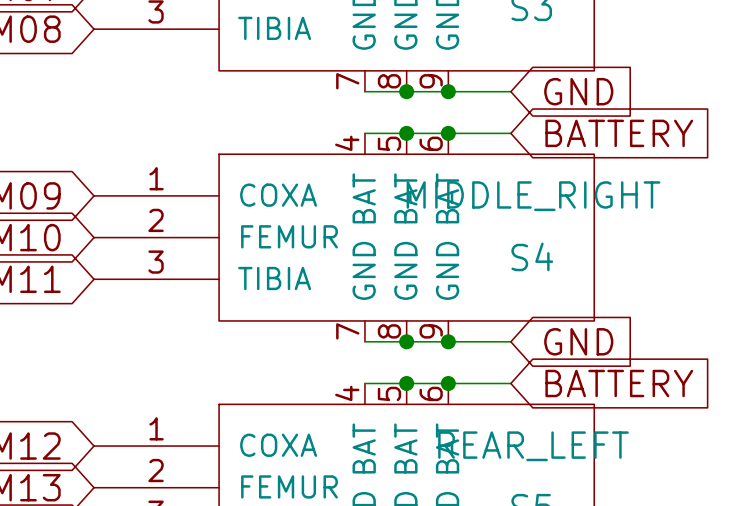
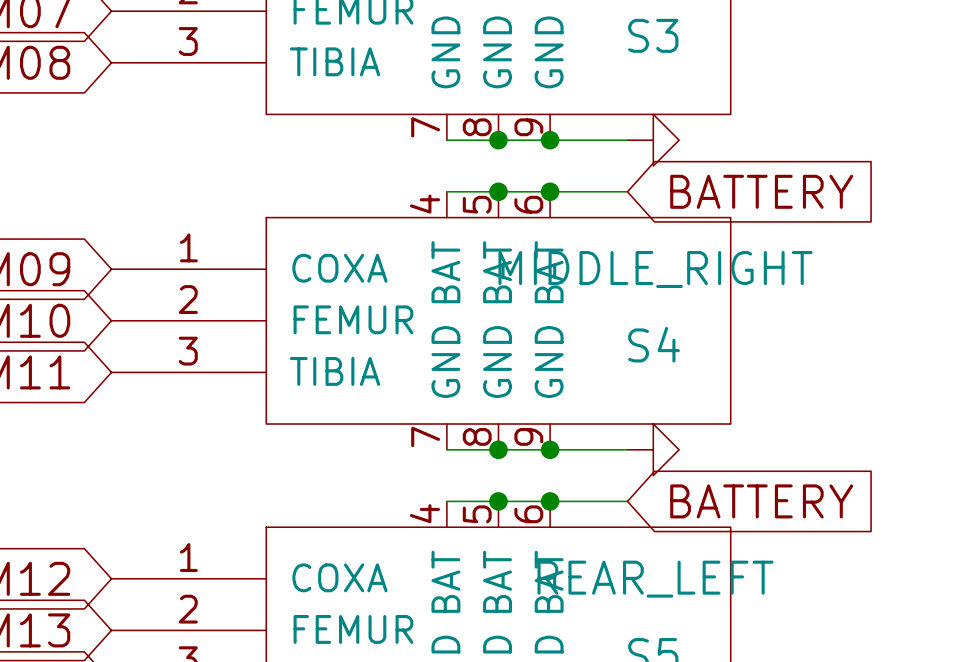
power symbol: none -> (653, 140)
global label: GND (578, 91) -> none
power symbol: none -> (653, 449)
global label: GND (578, 341) -> none

